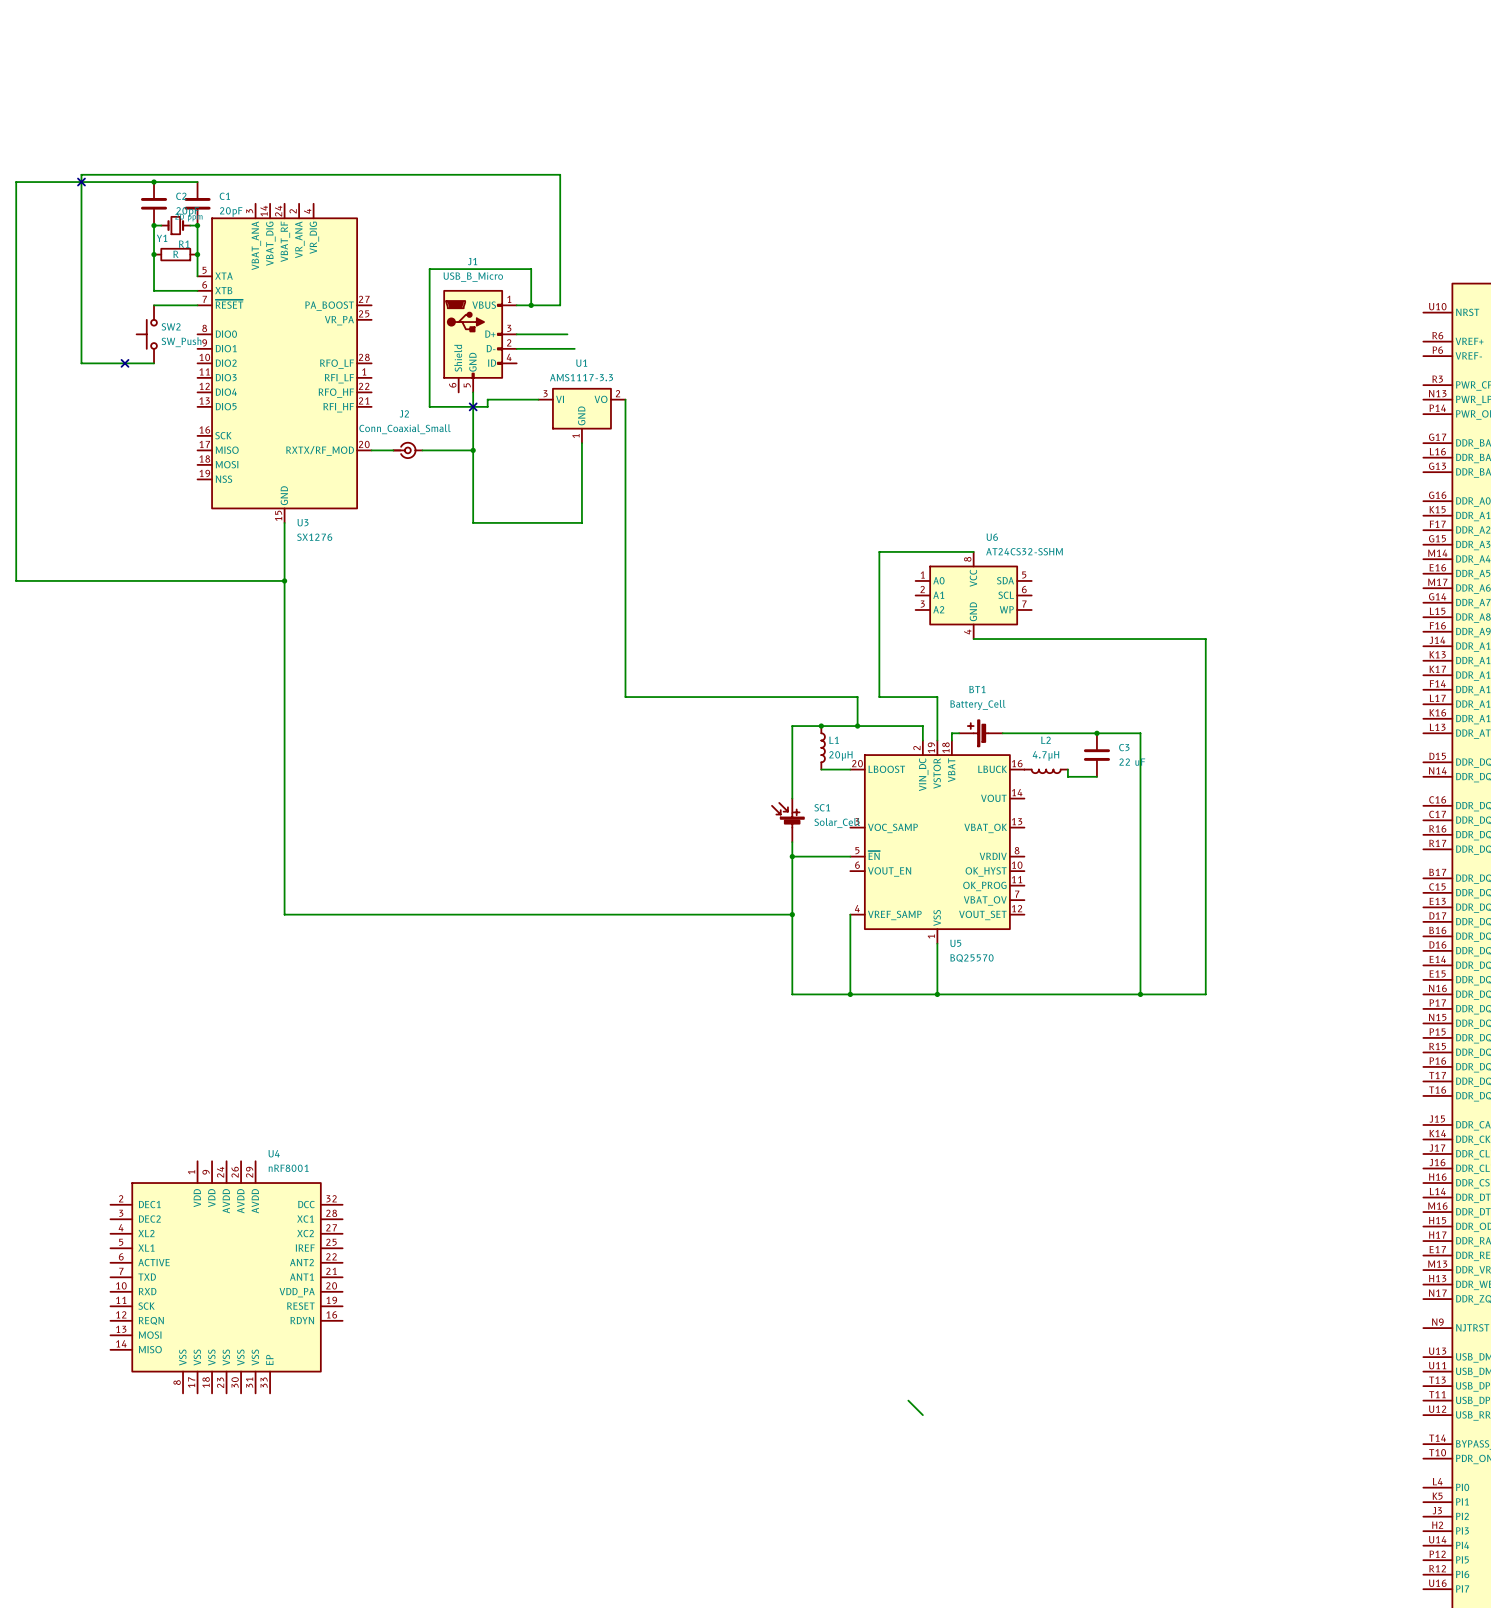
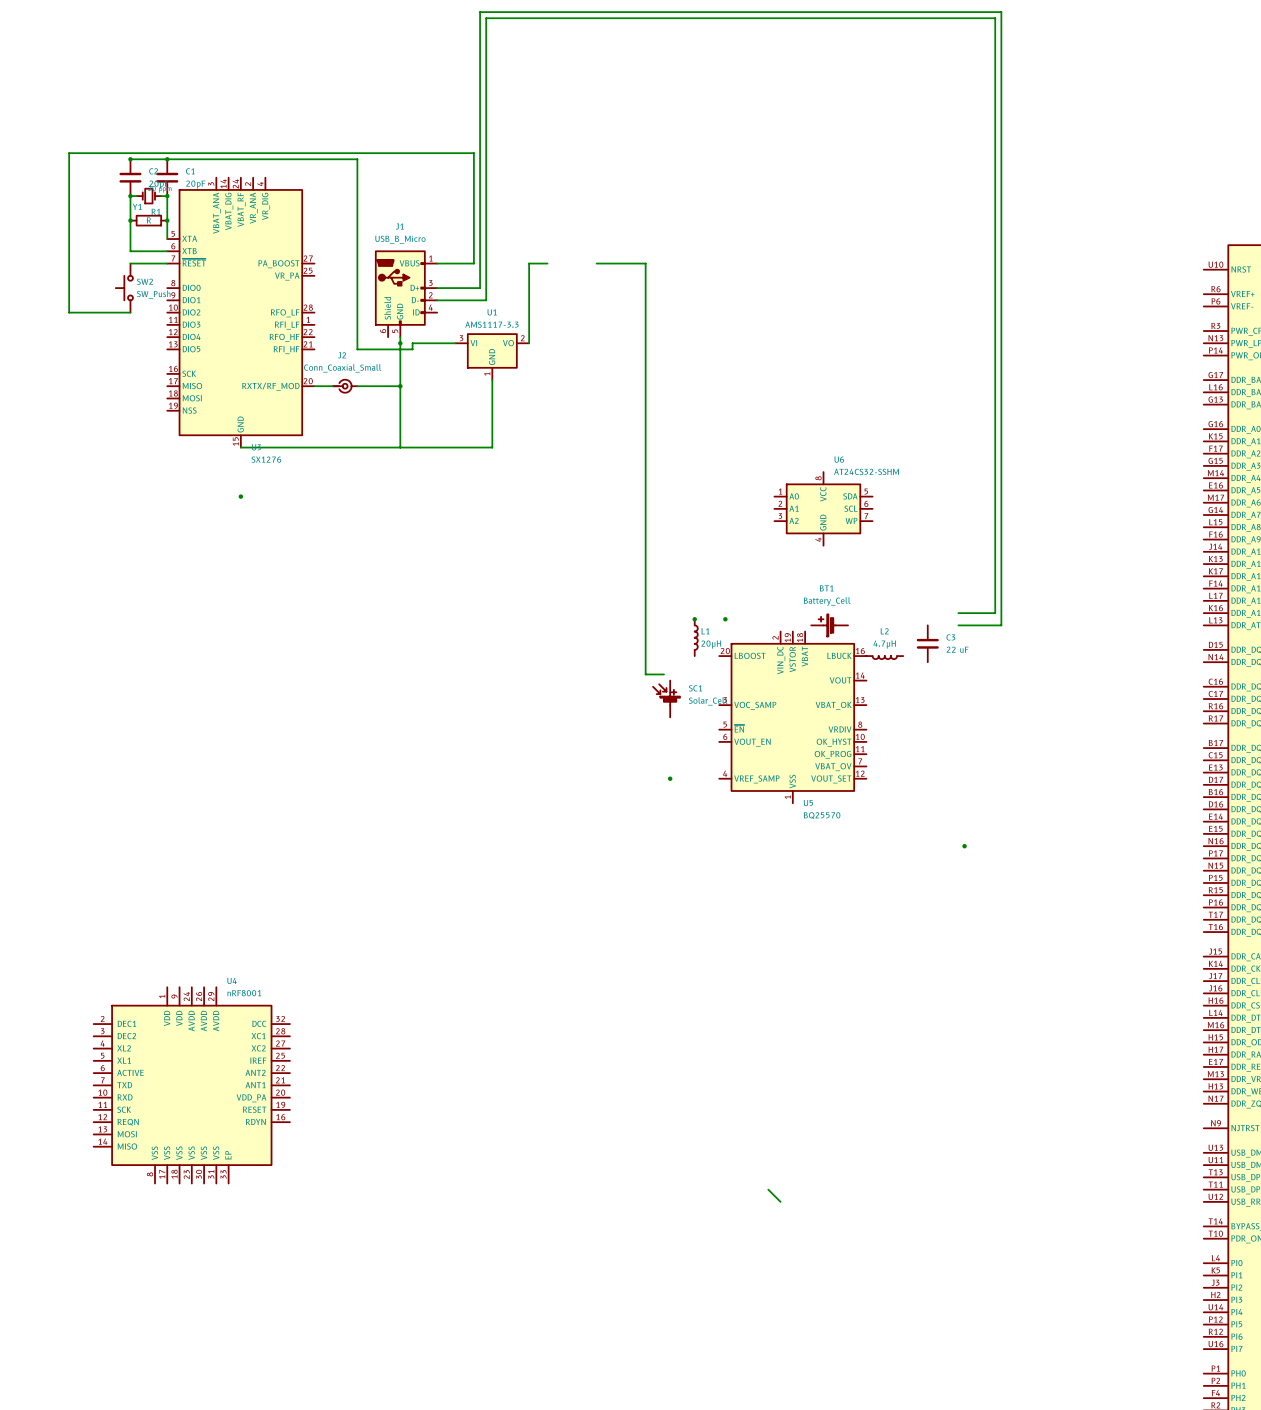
no-connect mark: (81, 182) -> none
wire: (154, 182) (16, 182) (16, 580) (284, 580) -> none
junction: none -> (167, 159)
wire: (531, 305) (531, 269) (429, 269) (429, 406) -> (167, 159) (357, 159) (357, 349) (363, 349)
junction: (531, 305) -> none
wire: none -> (596, 263) (645, 263) (645, 674) (664, 674)
wire: none -> (486, 300) (486, 18) (995, 18) (995, 613) (958, 613)
no-connect mark: (125, 363) -> none
junction: none -> (400, 343)
wire: (625, 399) (625, 697) (857, 697) (857, 726) -> (529, 343) (529, 263) (547, 263)
no-connect mark: (473, 406) -> none
wire: (284, 522) (284, 914) (792, 914) -> (240, 447) (400, 447)
wire: (973, 551) (879, 551) (879, 697) (937, 697) (937, 740) -> none
wire: (973, 639) (1205, 639) (1205, 994) (792, 994) (792, 842) -> none
wire: (959, 733) (951, 733) (951, 740) -> none
wire: (1002, 733) (1133, 733) -> none
junction: (1096, 733) -> none
wire: (1140, 733) (1140, 994) -> (964, 625) (1001, 625) (1001, 12) (480, 12) (480, 288)
wire: (922, 740) (922, 726) (792, 726) (792, 798) -> none
wire: (821, 769) (850, 769) -> none
wire: (1067, 769) (1067, 776) (1096, 776) -> none
wire: (792, 856) (850, 856) -> none
junction: (792, 856) -> none
wire: (850, 914) (850, 994) -> none
wire: (937, 943) (937, 994) -> none
junction: (850, 994) -> none
junction: (937, 994) -> none

